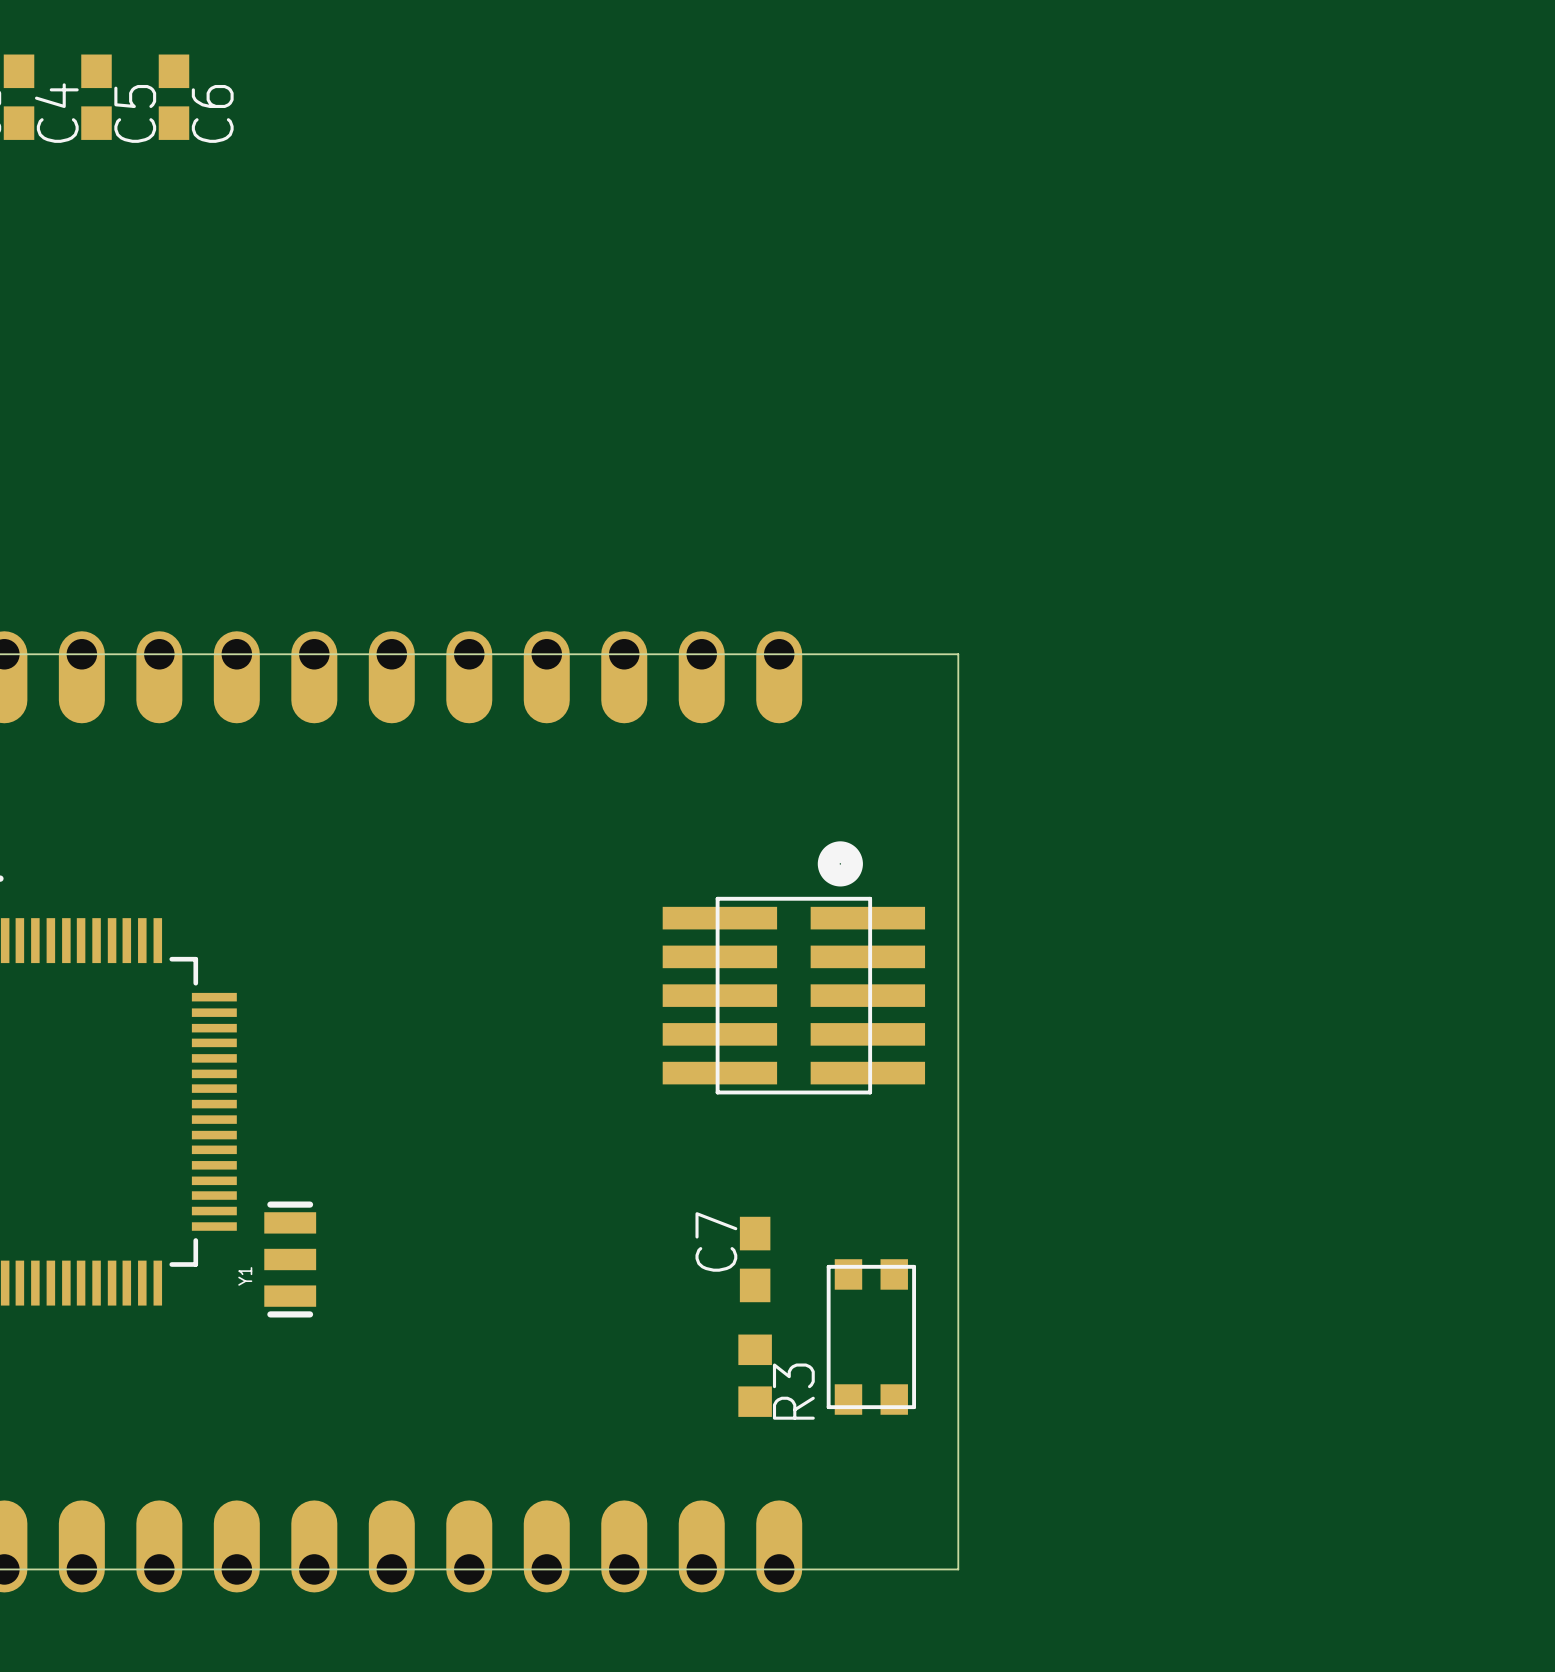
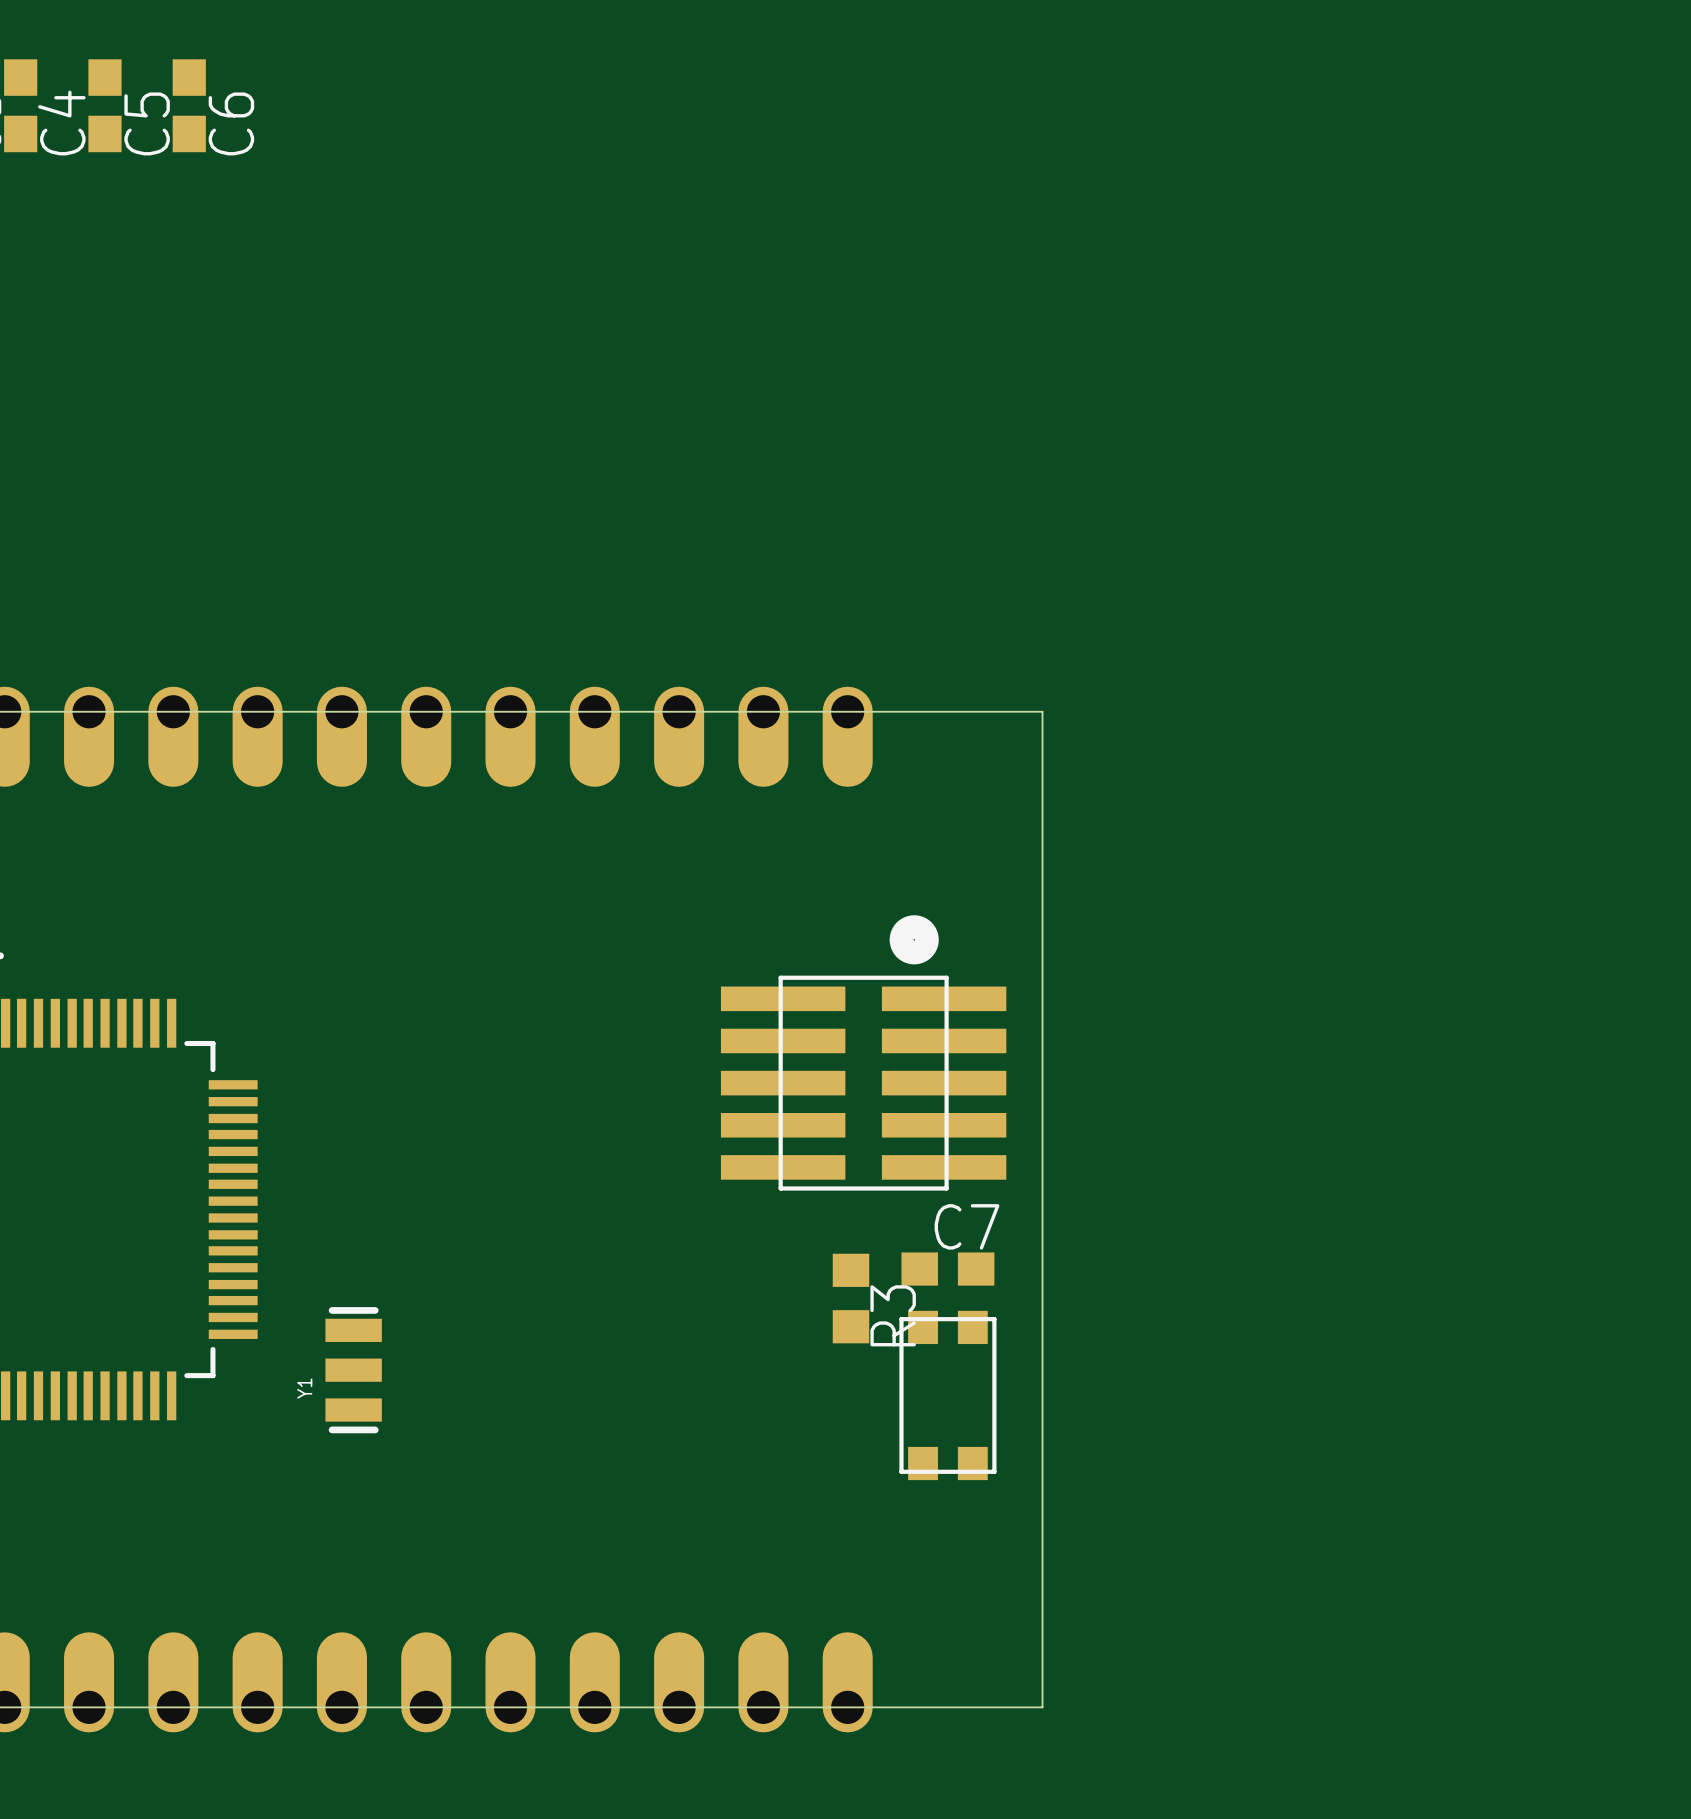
Y1 position: (290, 1259) -> (353, 1370)
C7 rotation: 0° (755, 1259) -> 90° clockwise (947, 1269)
C7 position: (755, 1259) -> (947, 1269)
part position: (871, 1336) -> (947, 1395)
R3 position: (755, 1375) -> (850, 1298)

